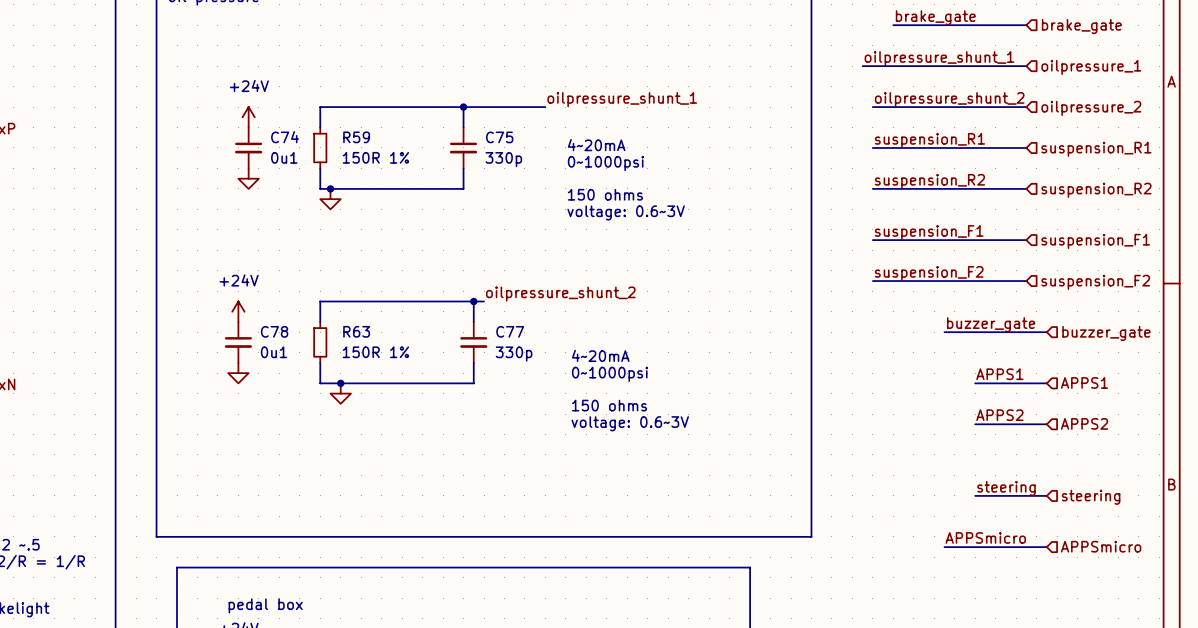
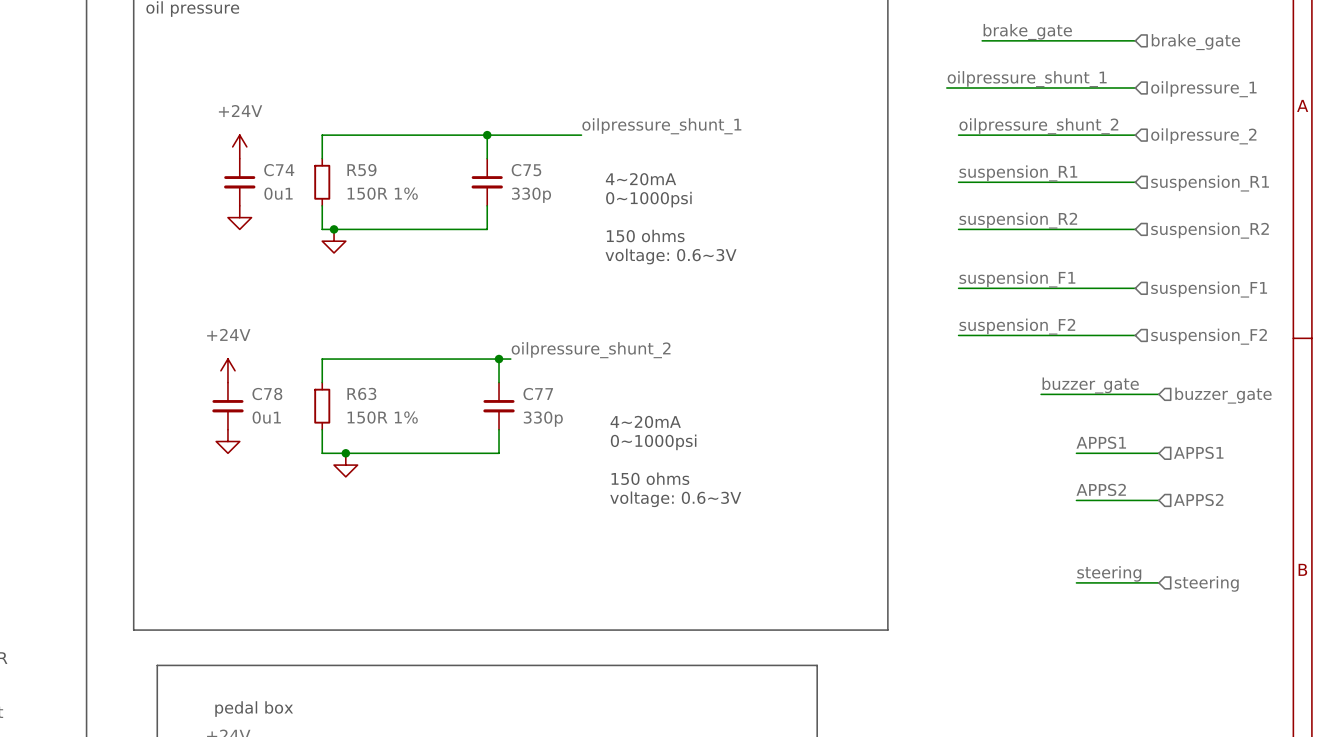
label: APPSmicro (985, 537) -> none
hierarchical label: APPSmicro (1101, 546) -> none
wire: (944, 547) (1046, 547) -> none

